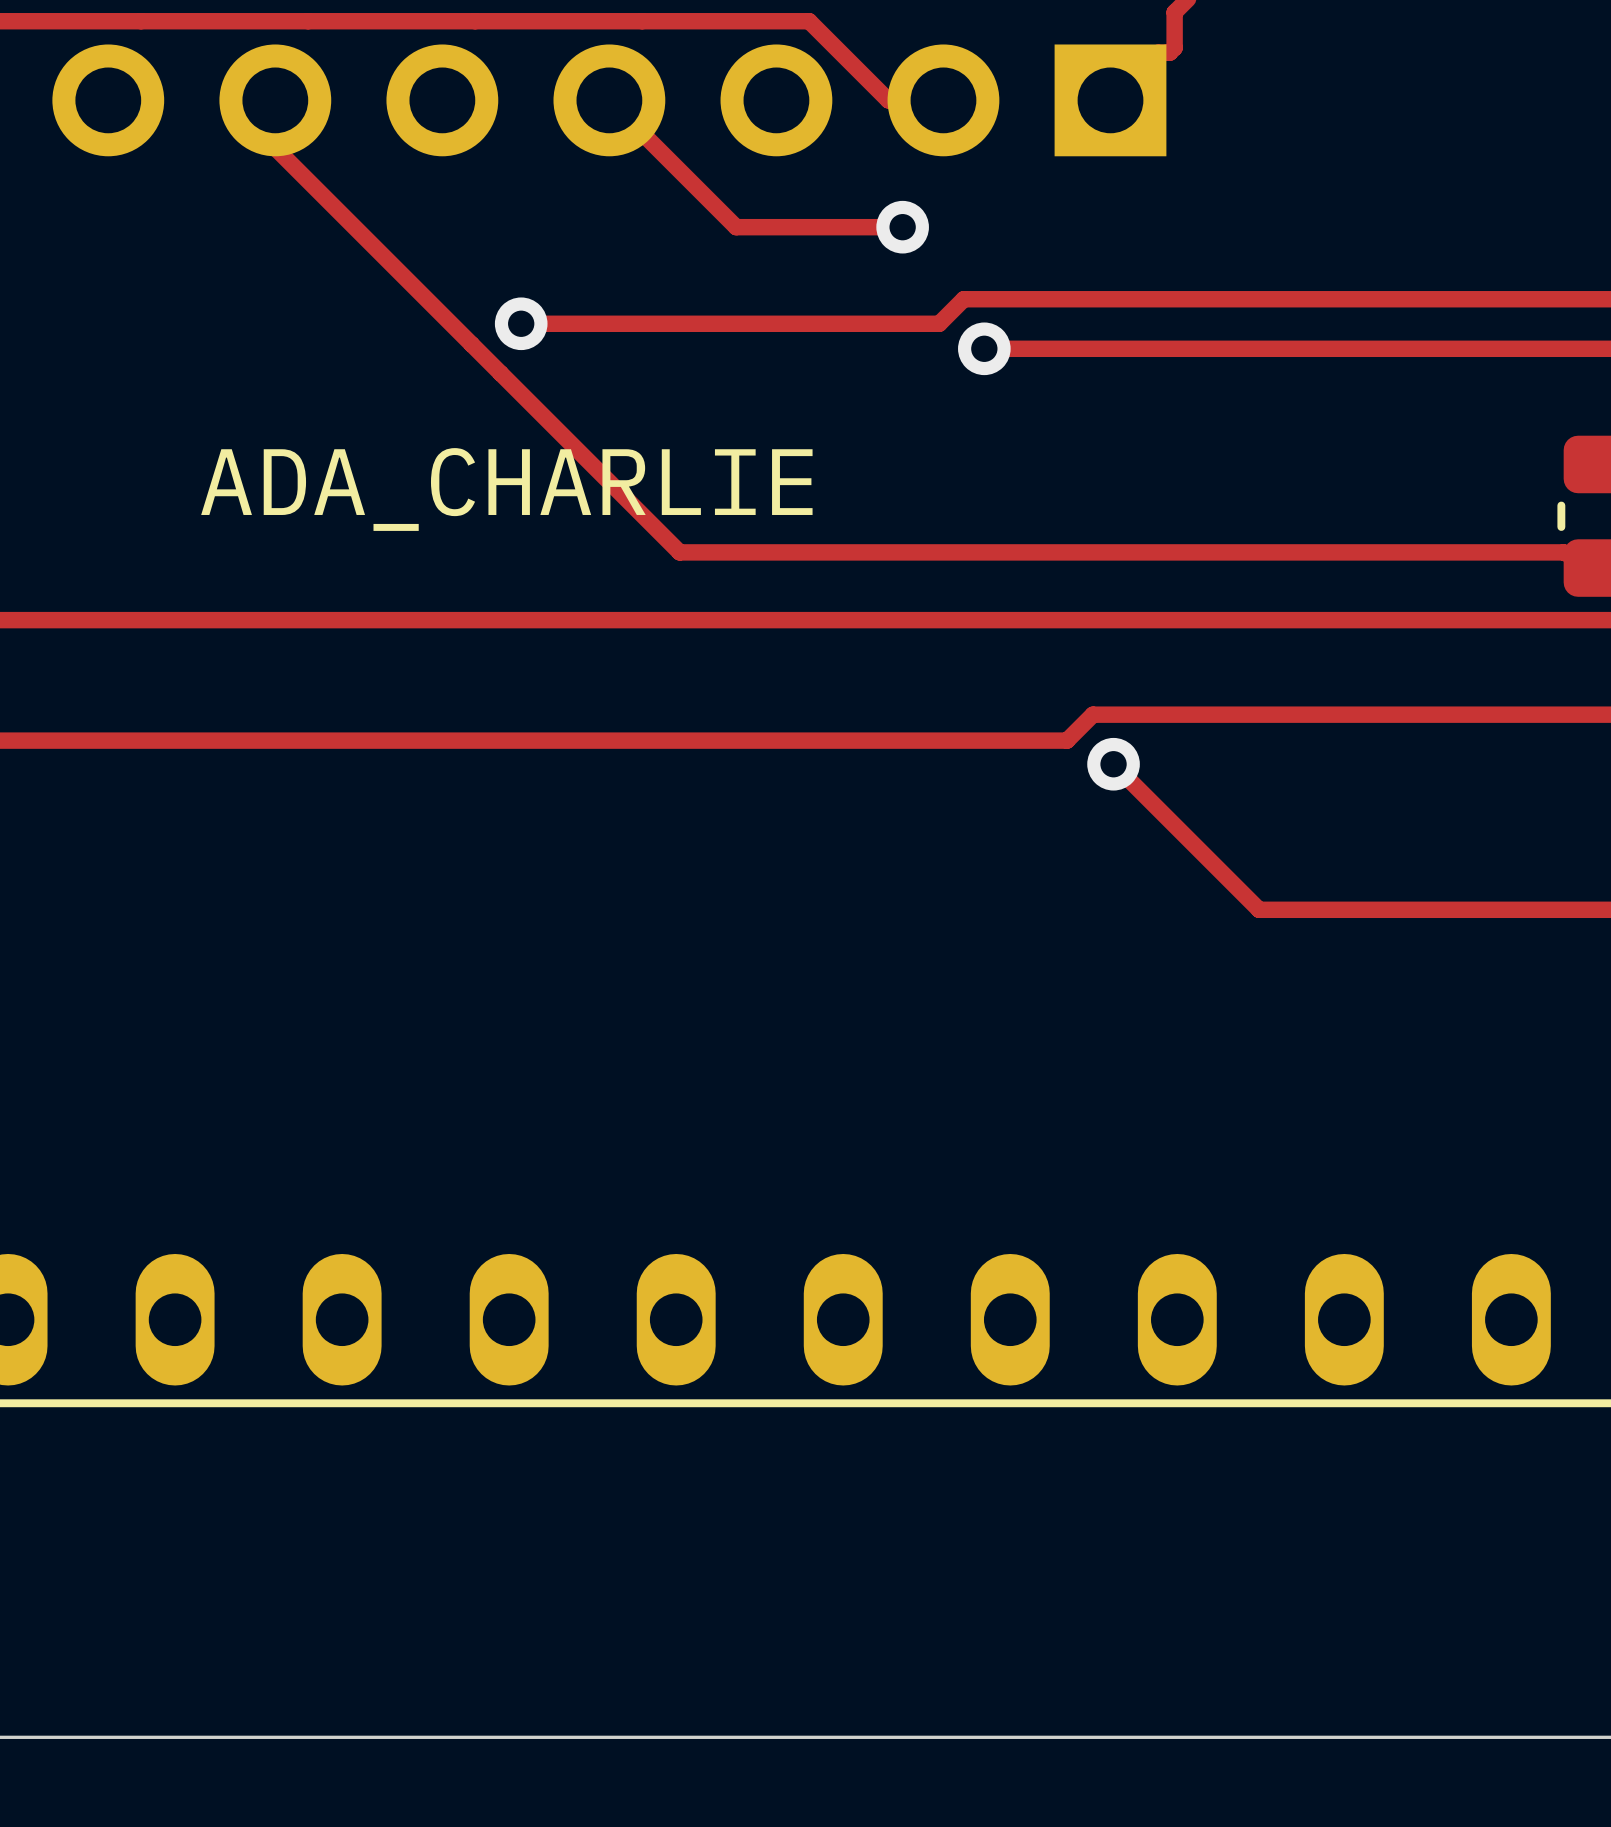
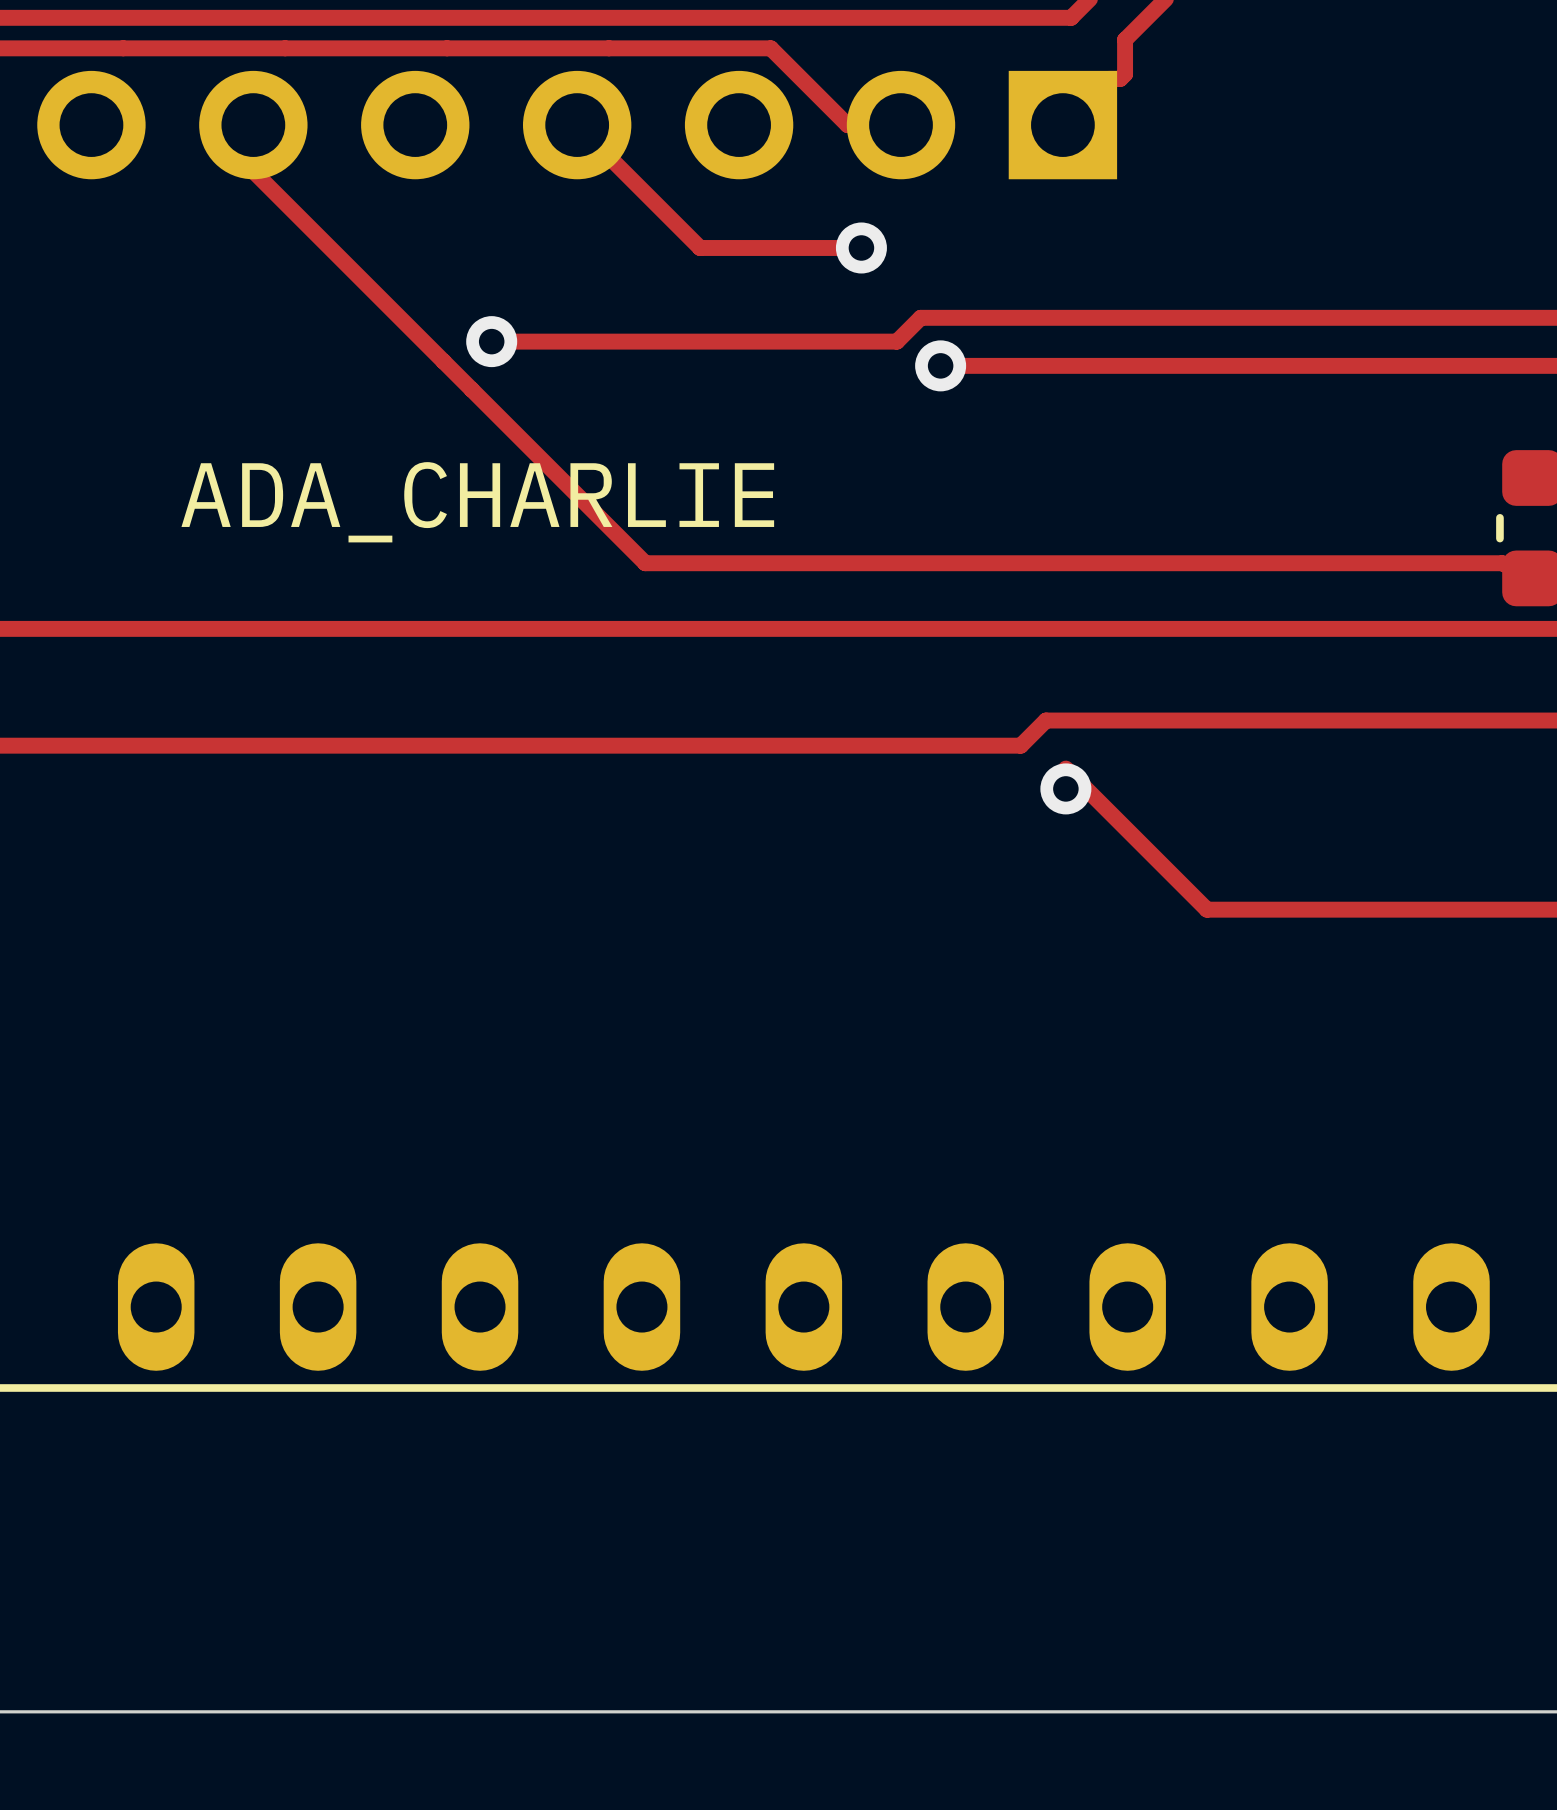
via position: (1113, 764) -> (1065, 788)

